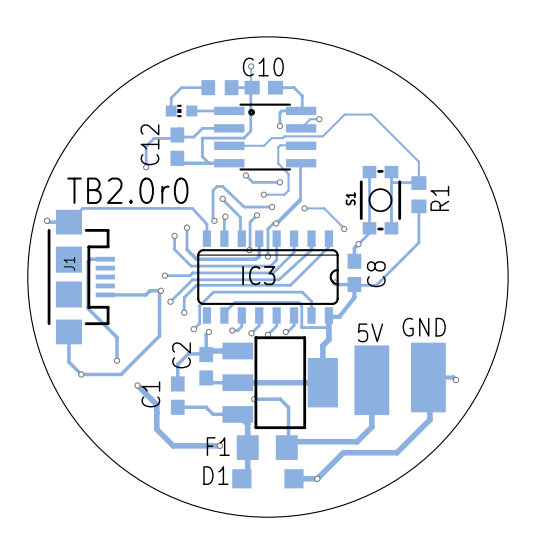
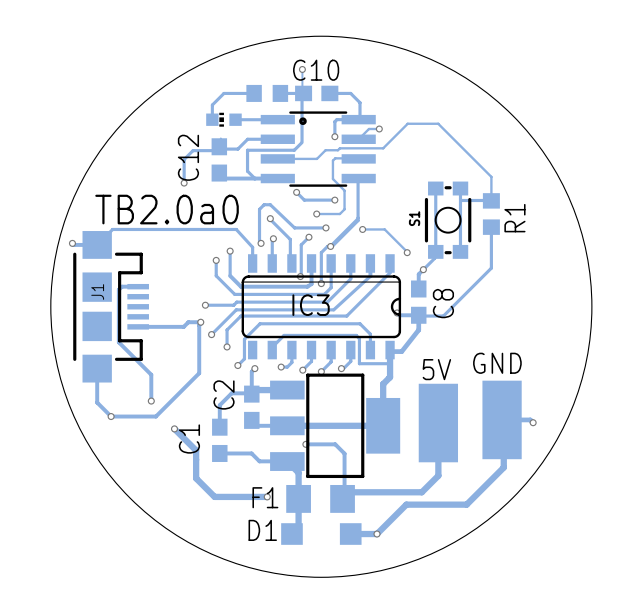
text: TB2.0r0 (127, 190) -> TB2.0a0 (167, 209)

